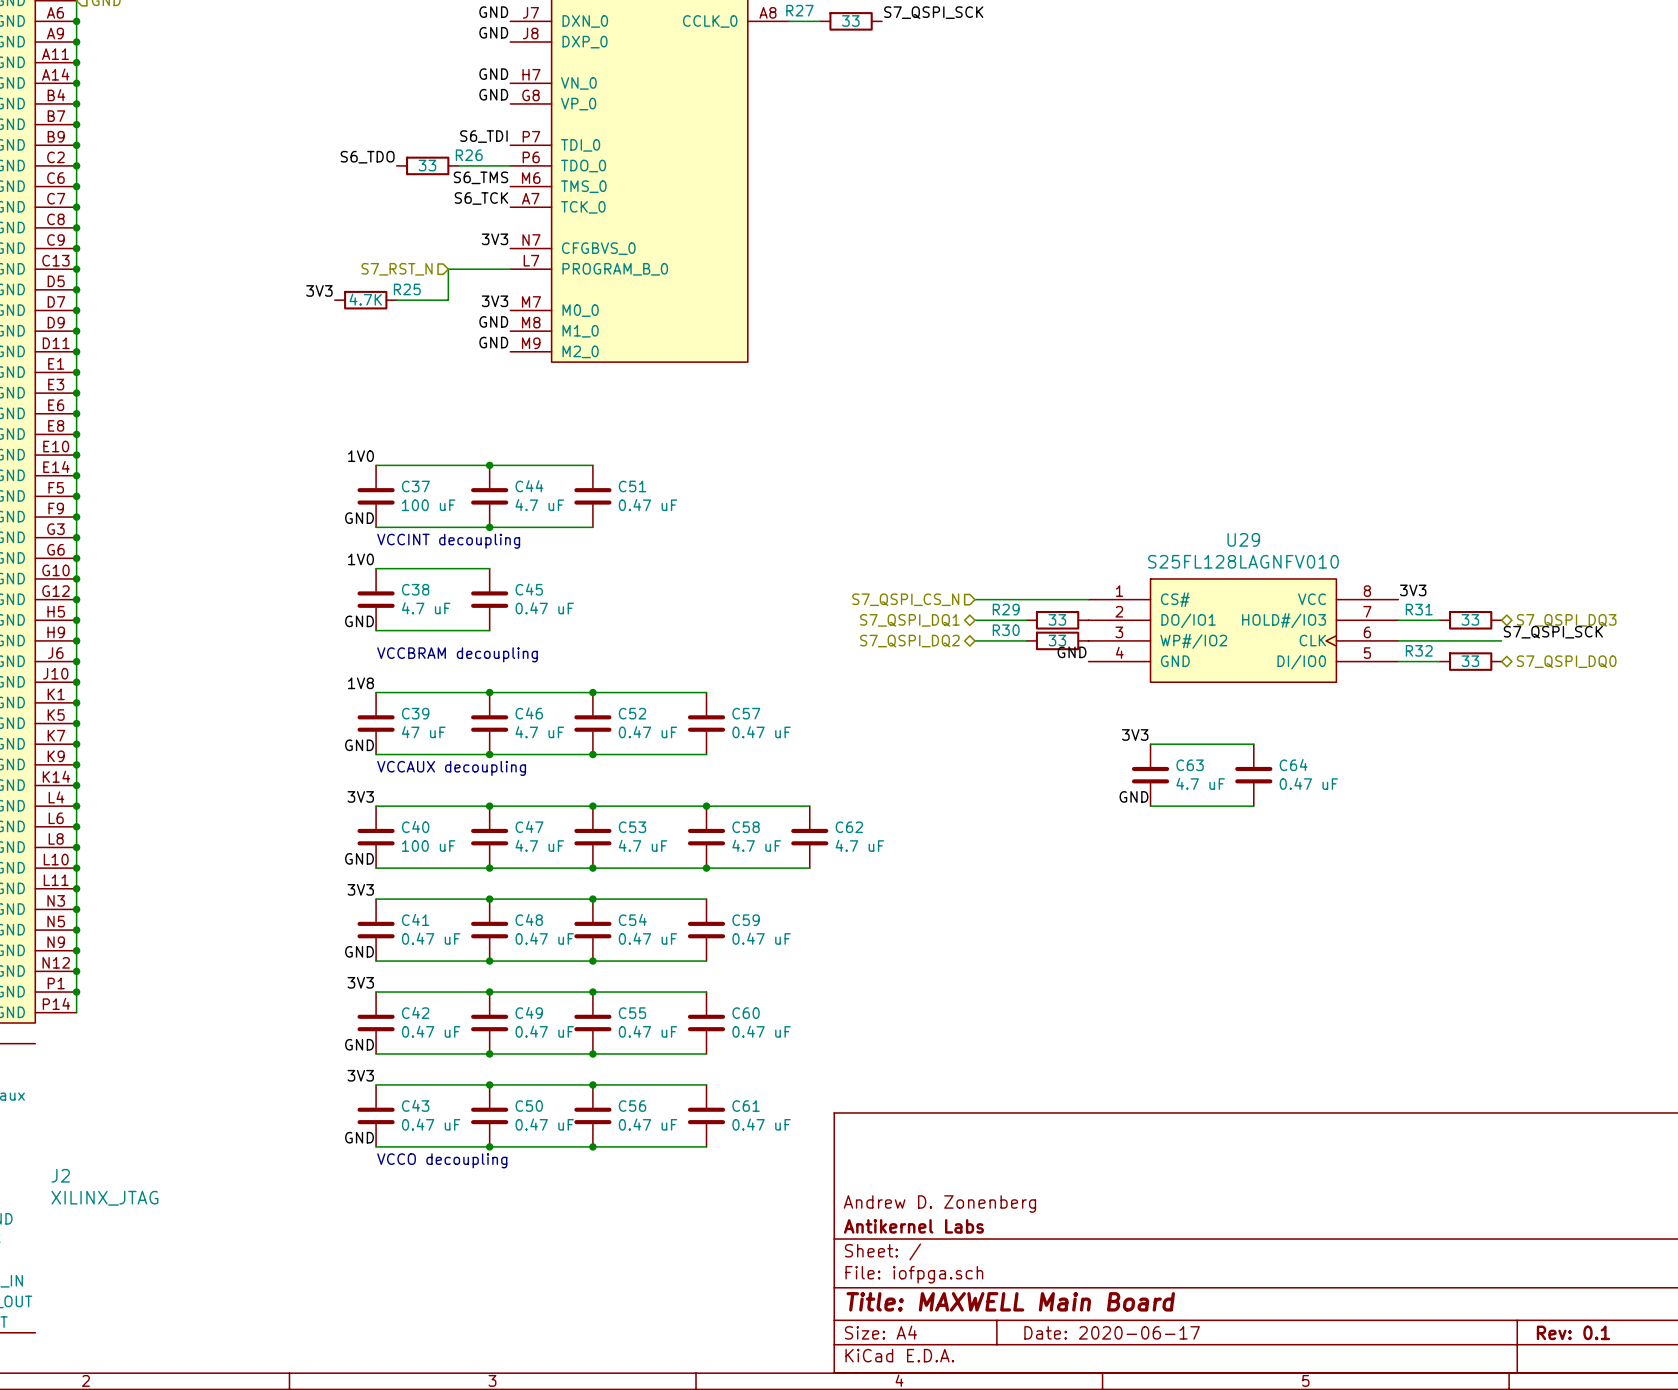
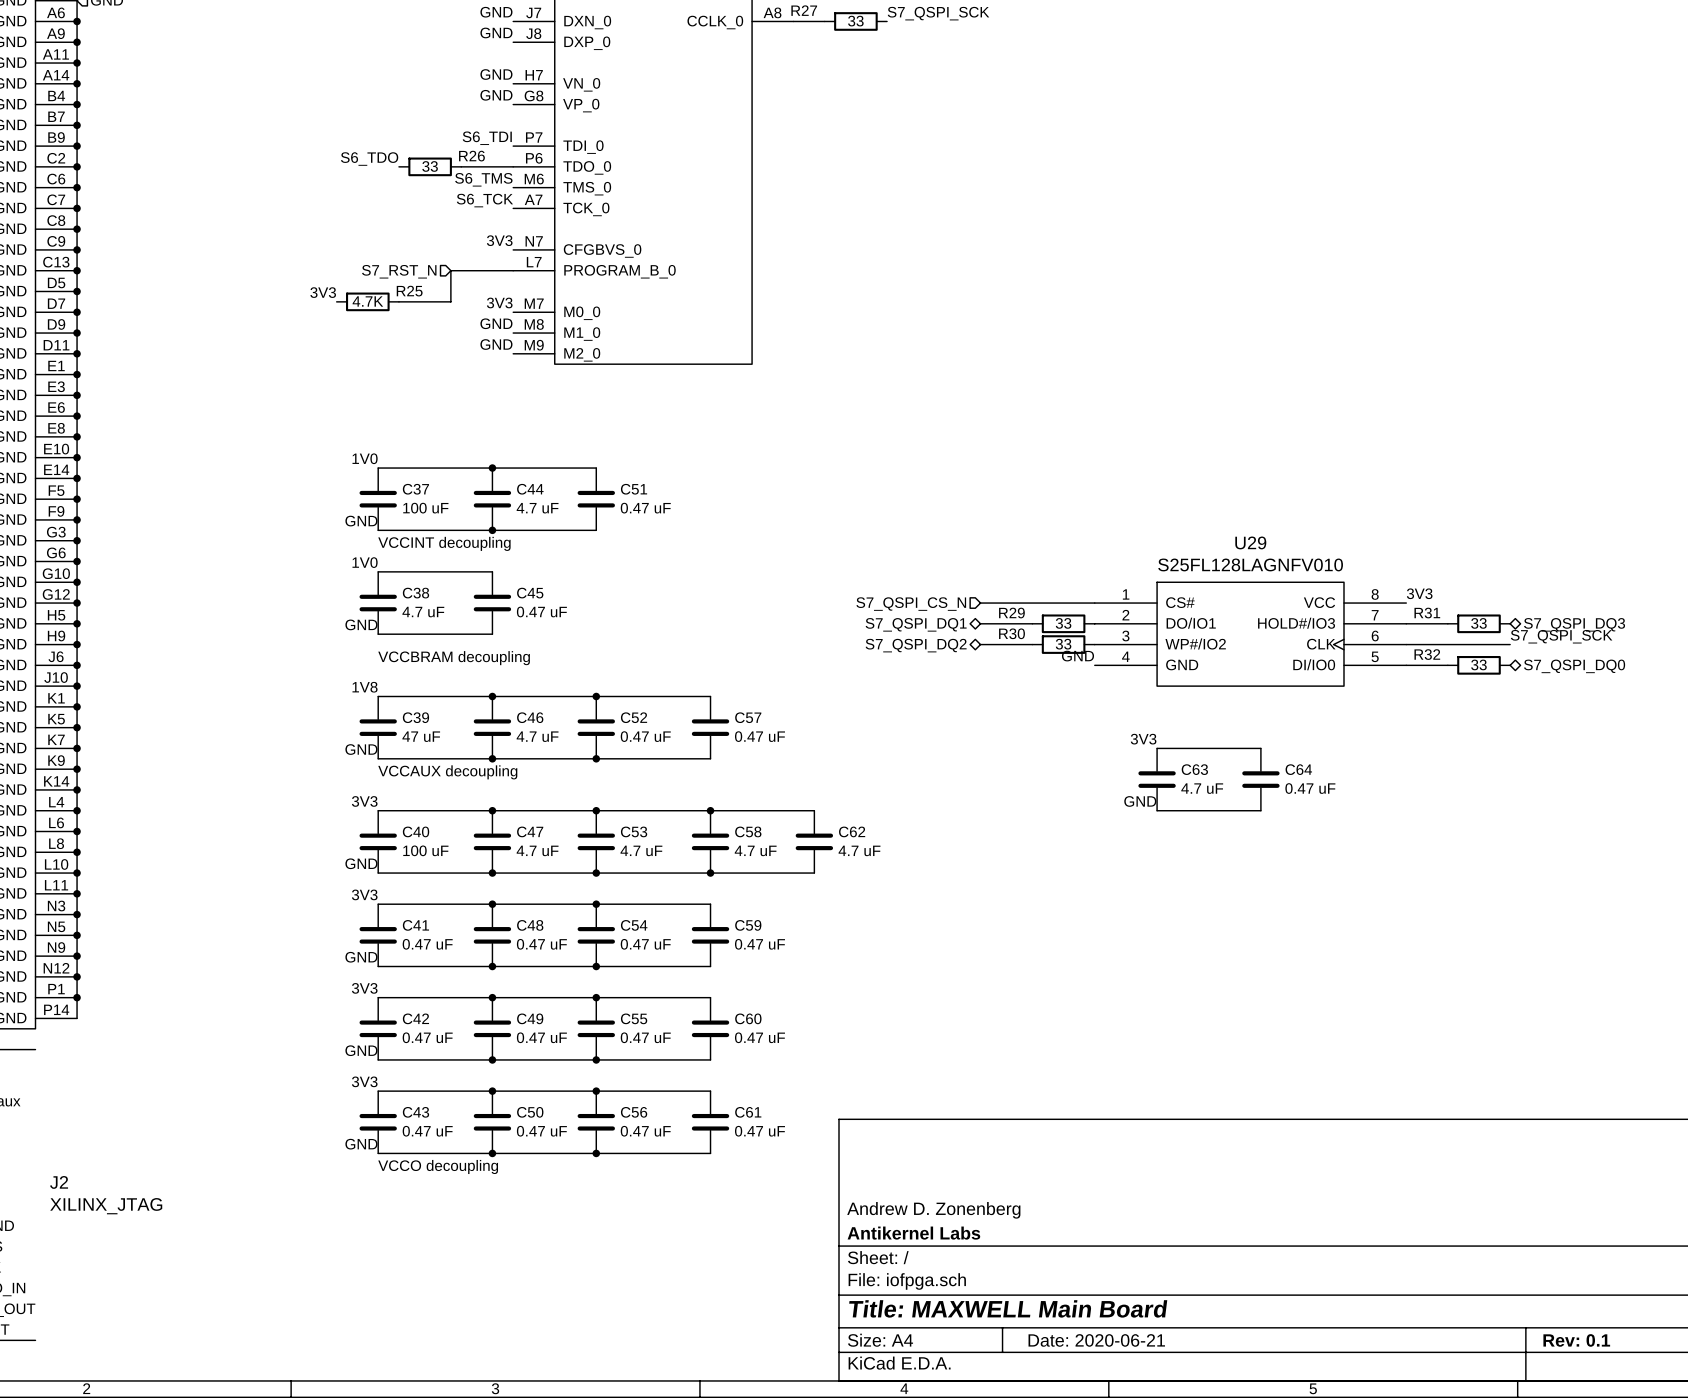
title block: Date: 2020-06-17 (1112, 1332) -> Date: 2020-06-21 (1096, 1340)

